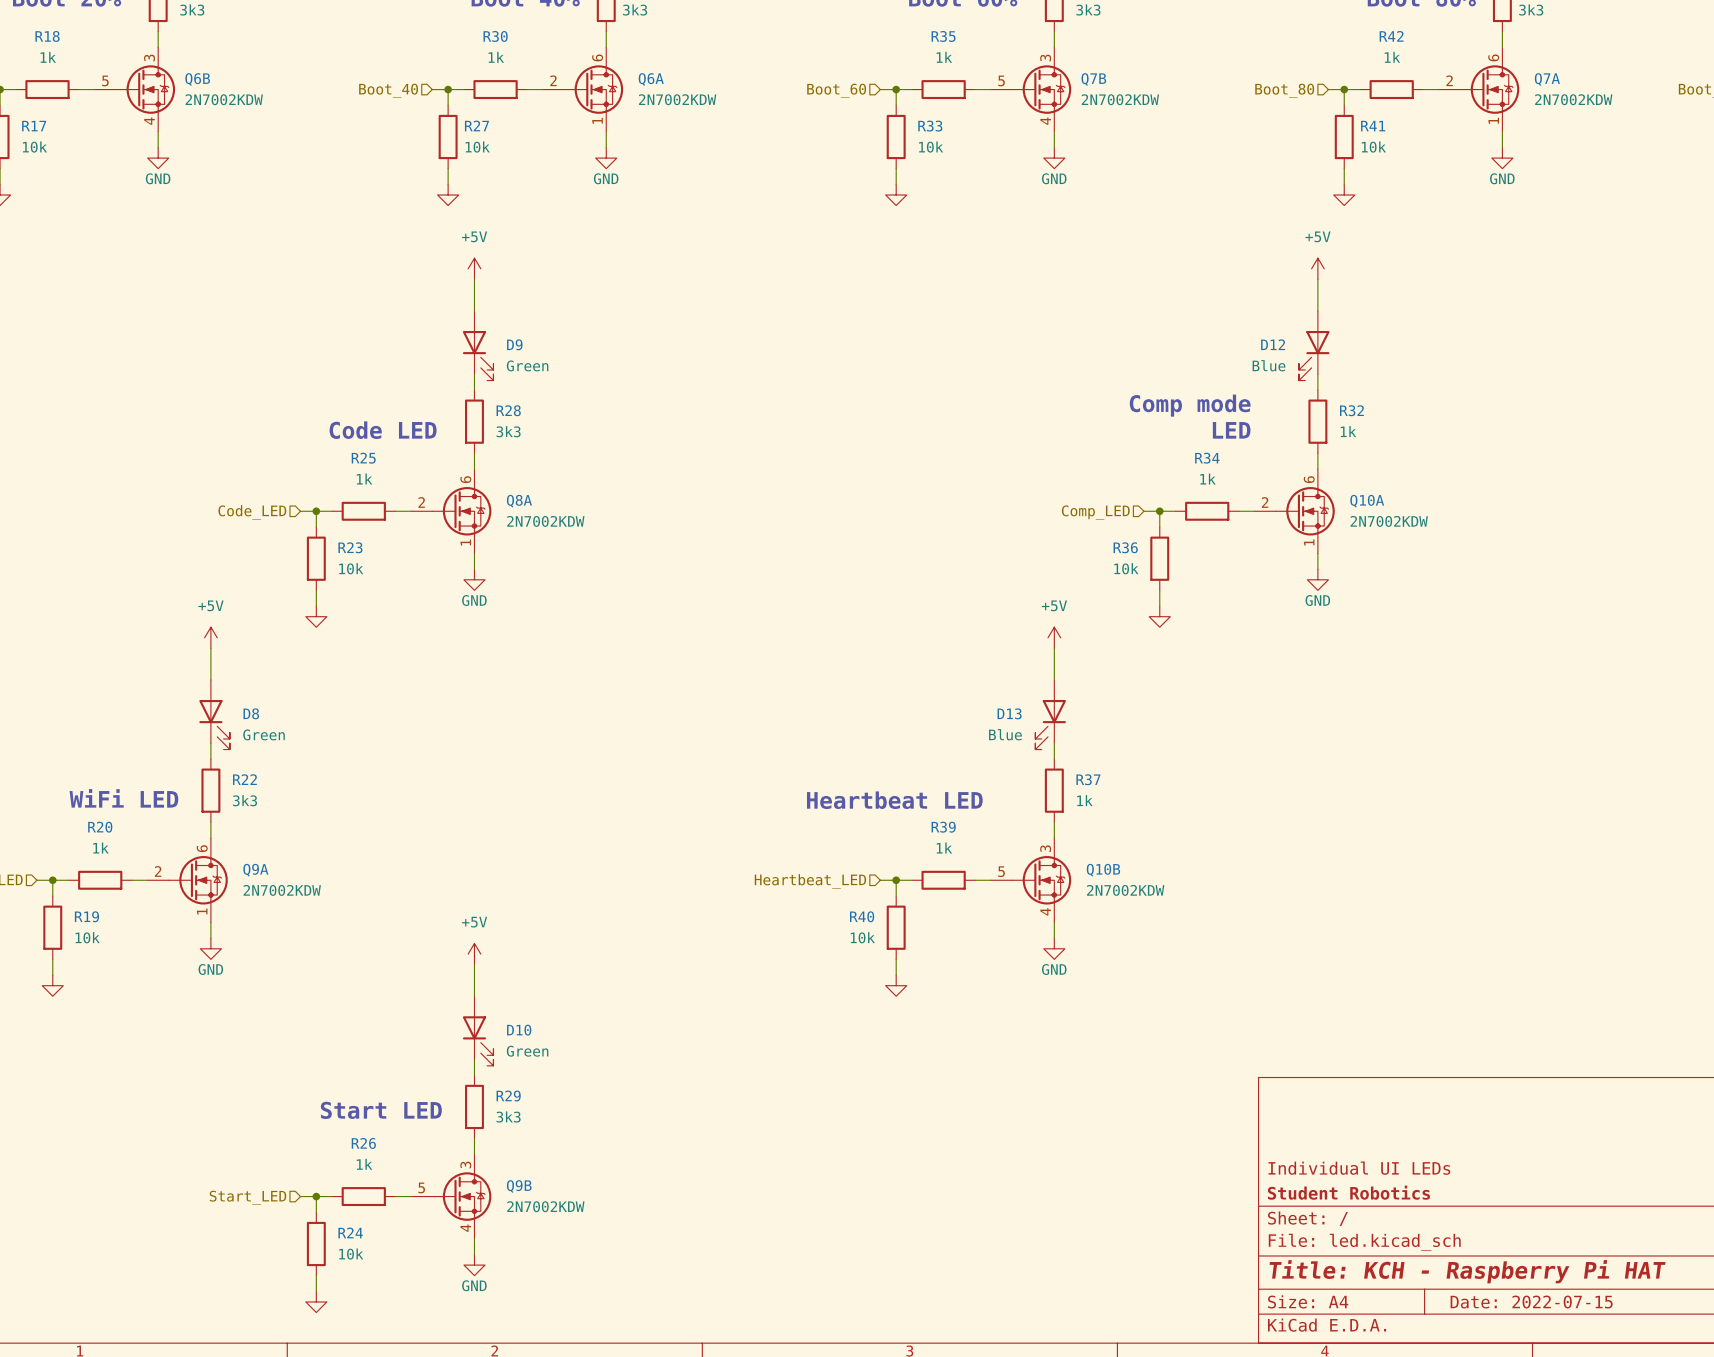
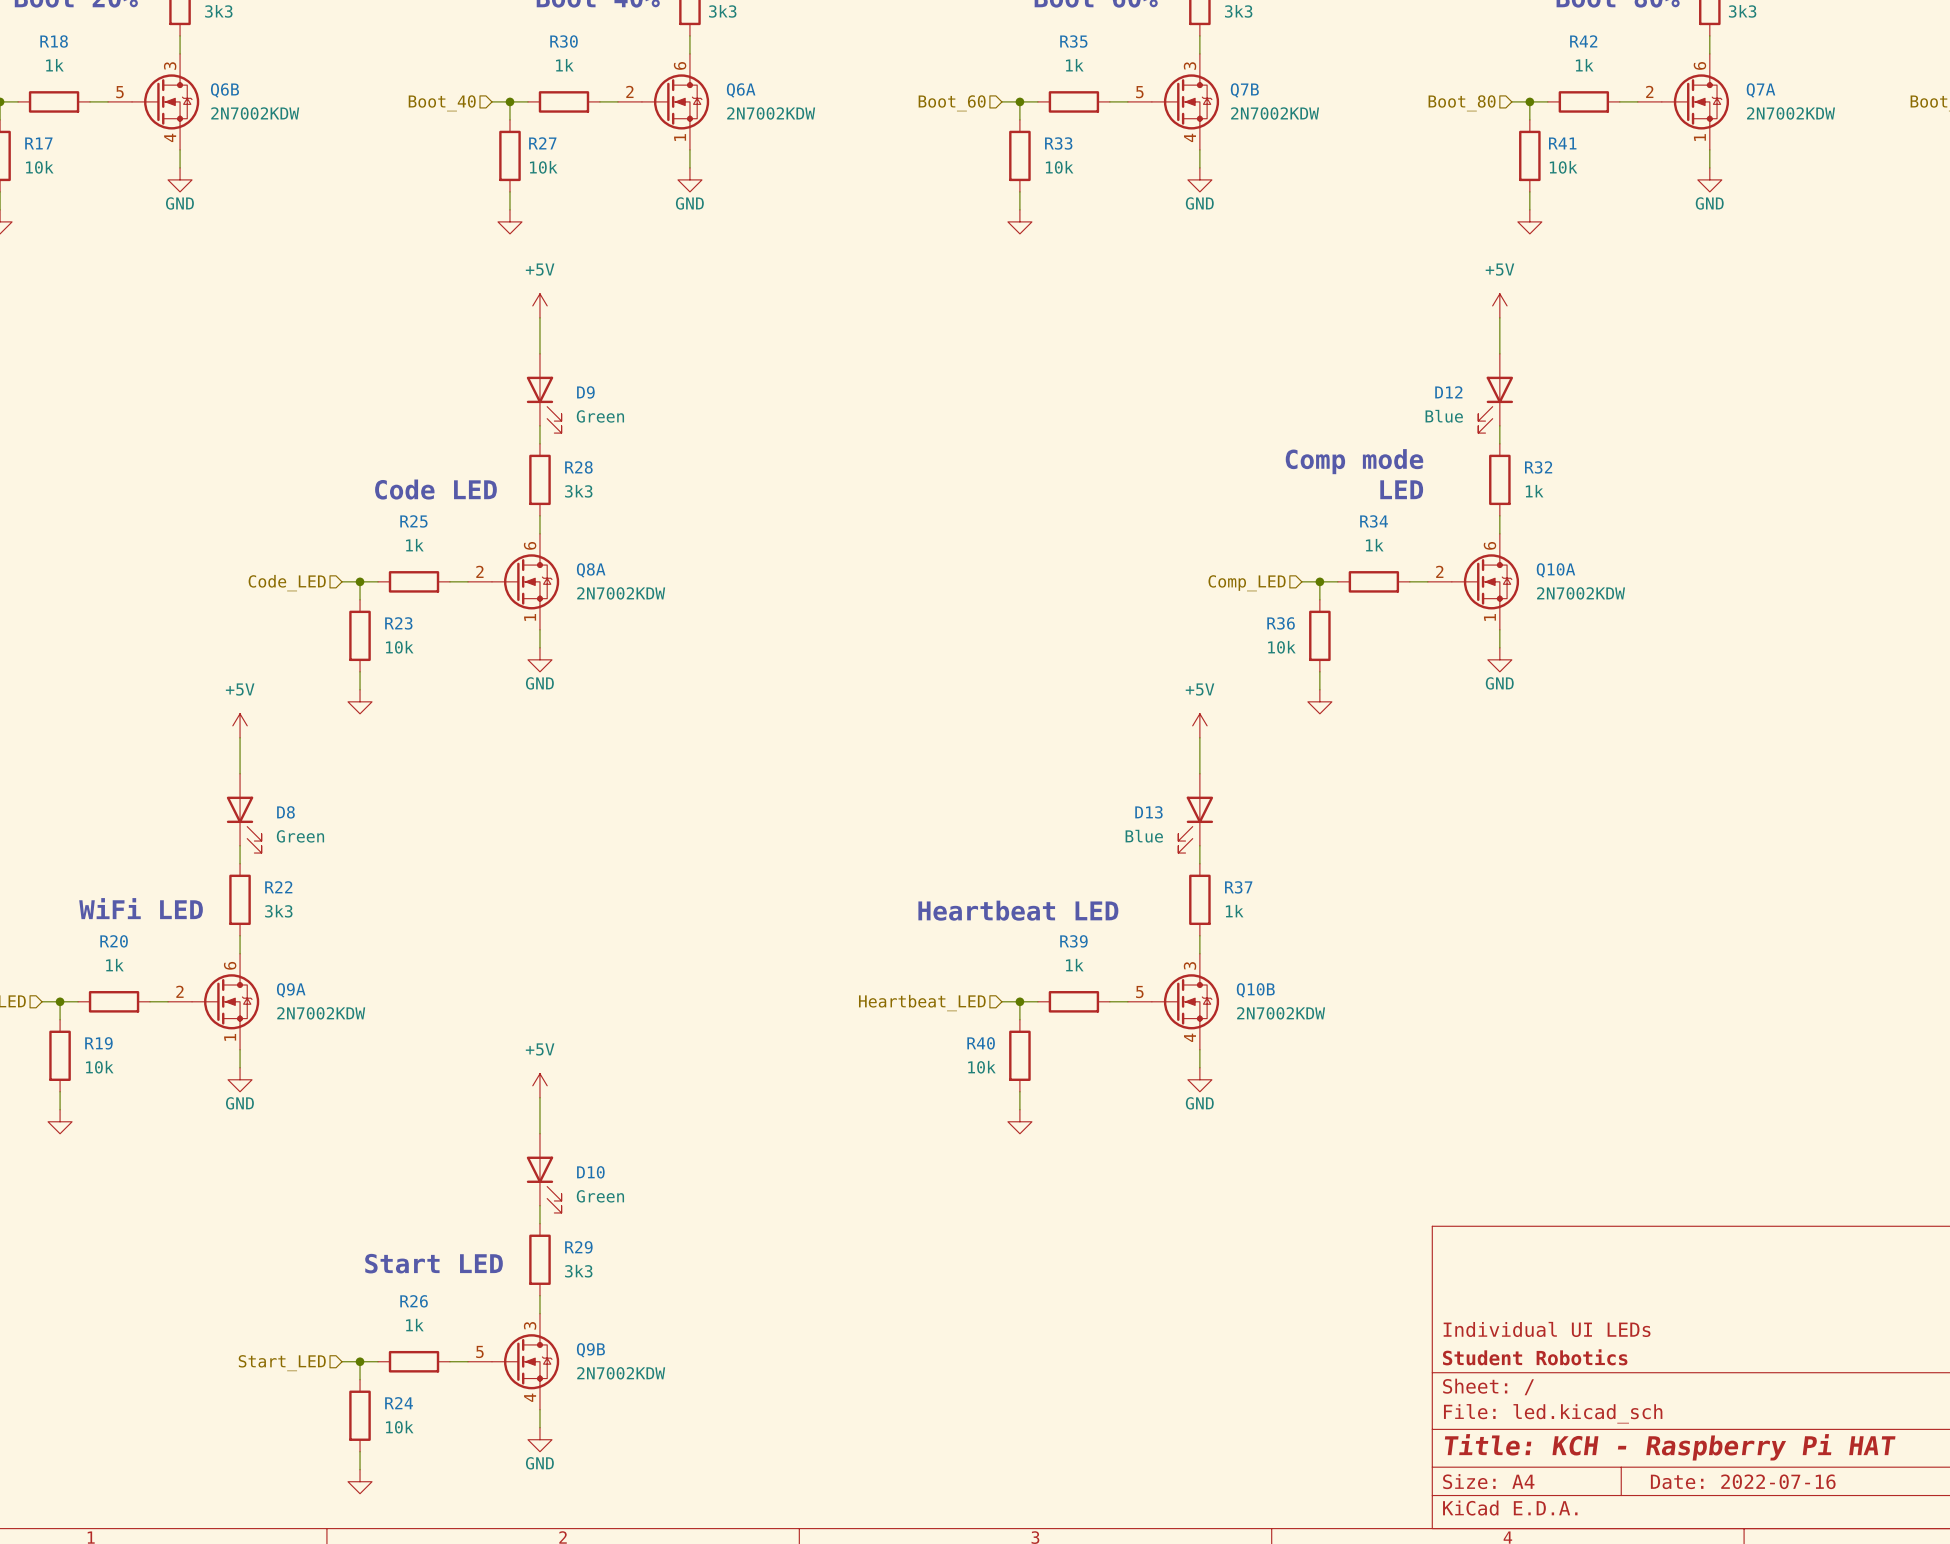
title block: Date: 2022-07-15 (1531, 1302) -> Date: 2022-07-16 (1743, 1481)

